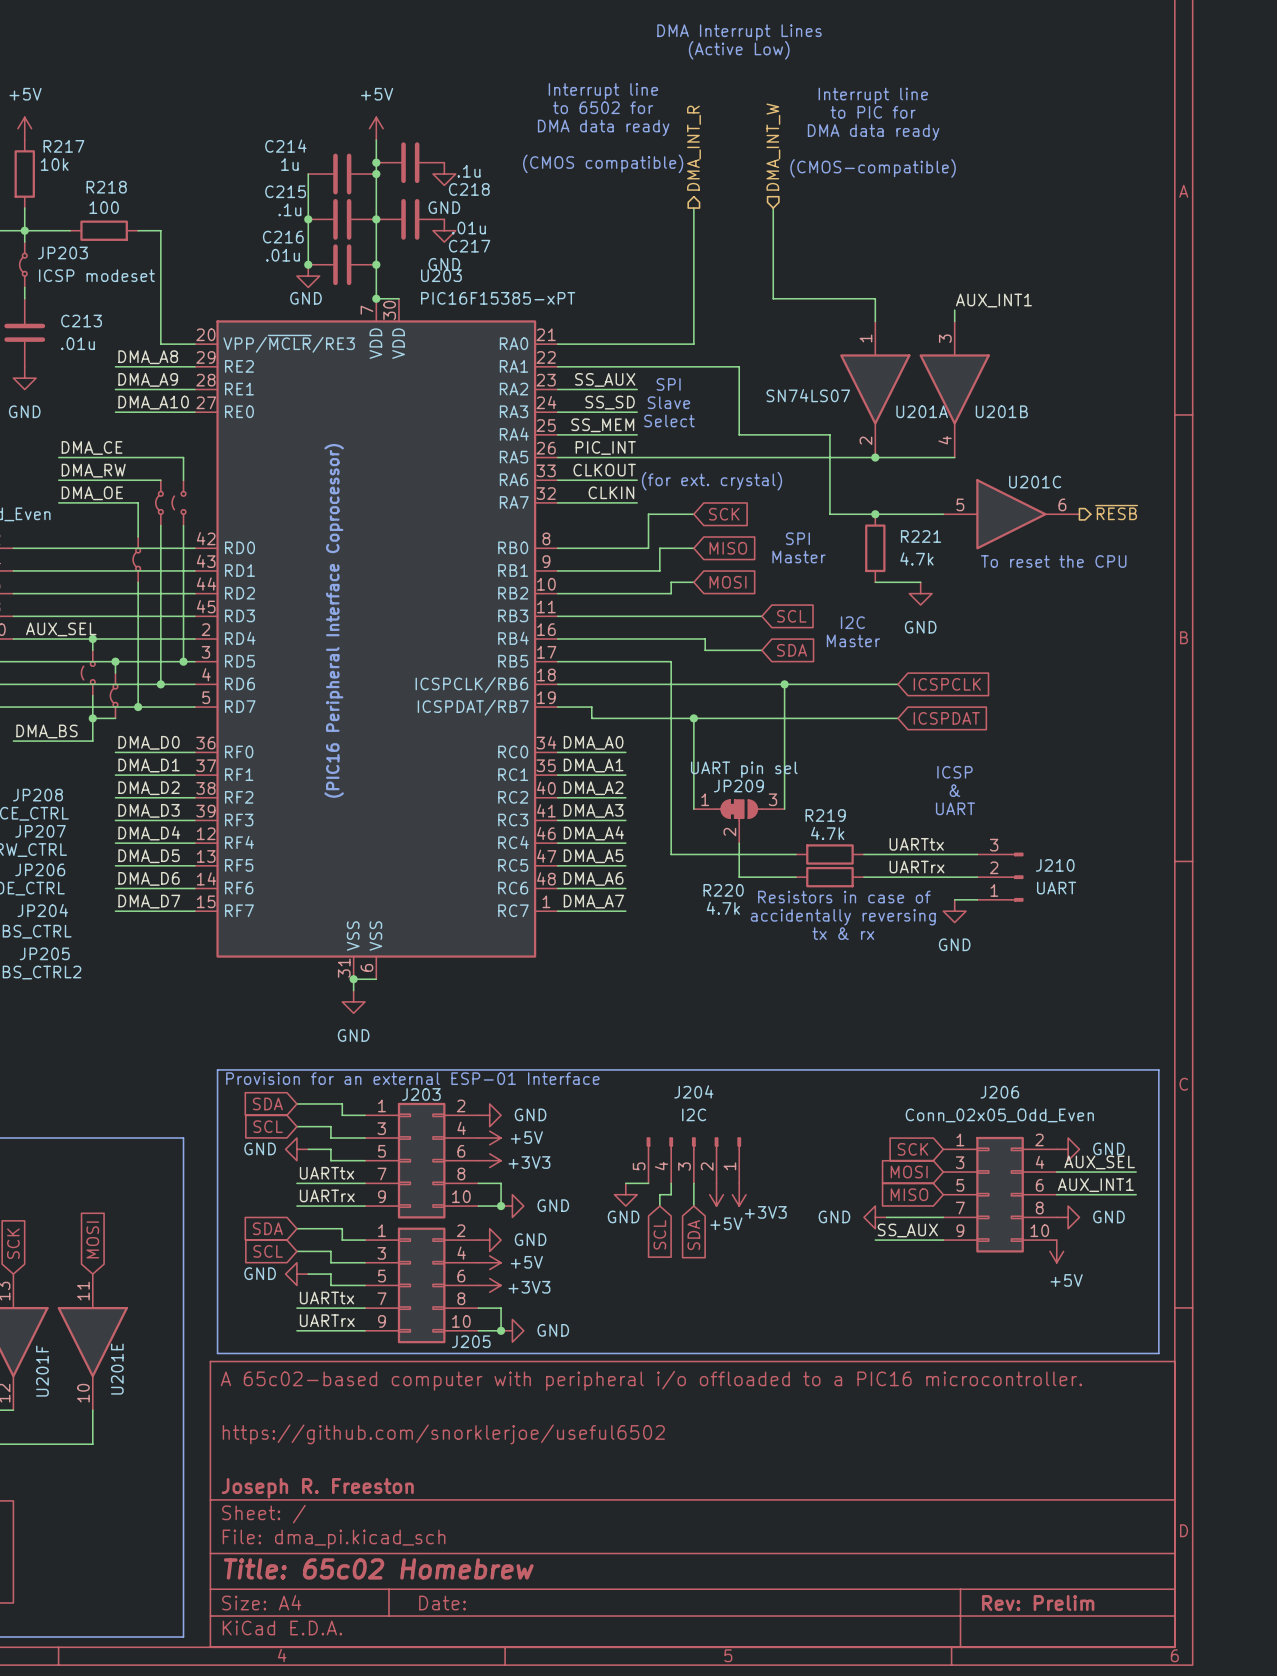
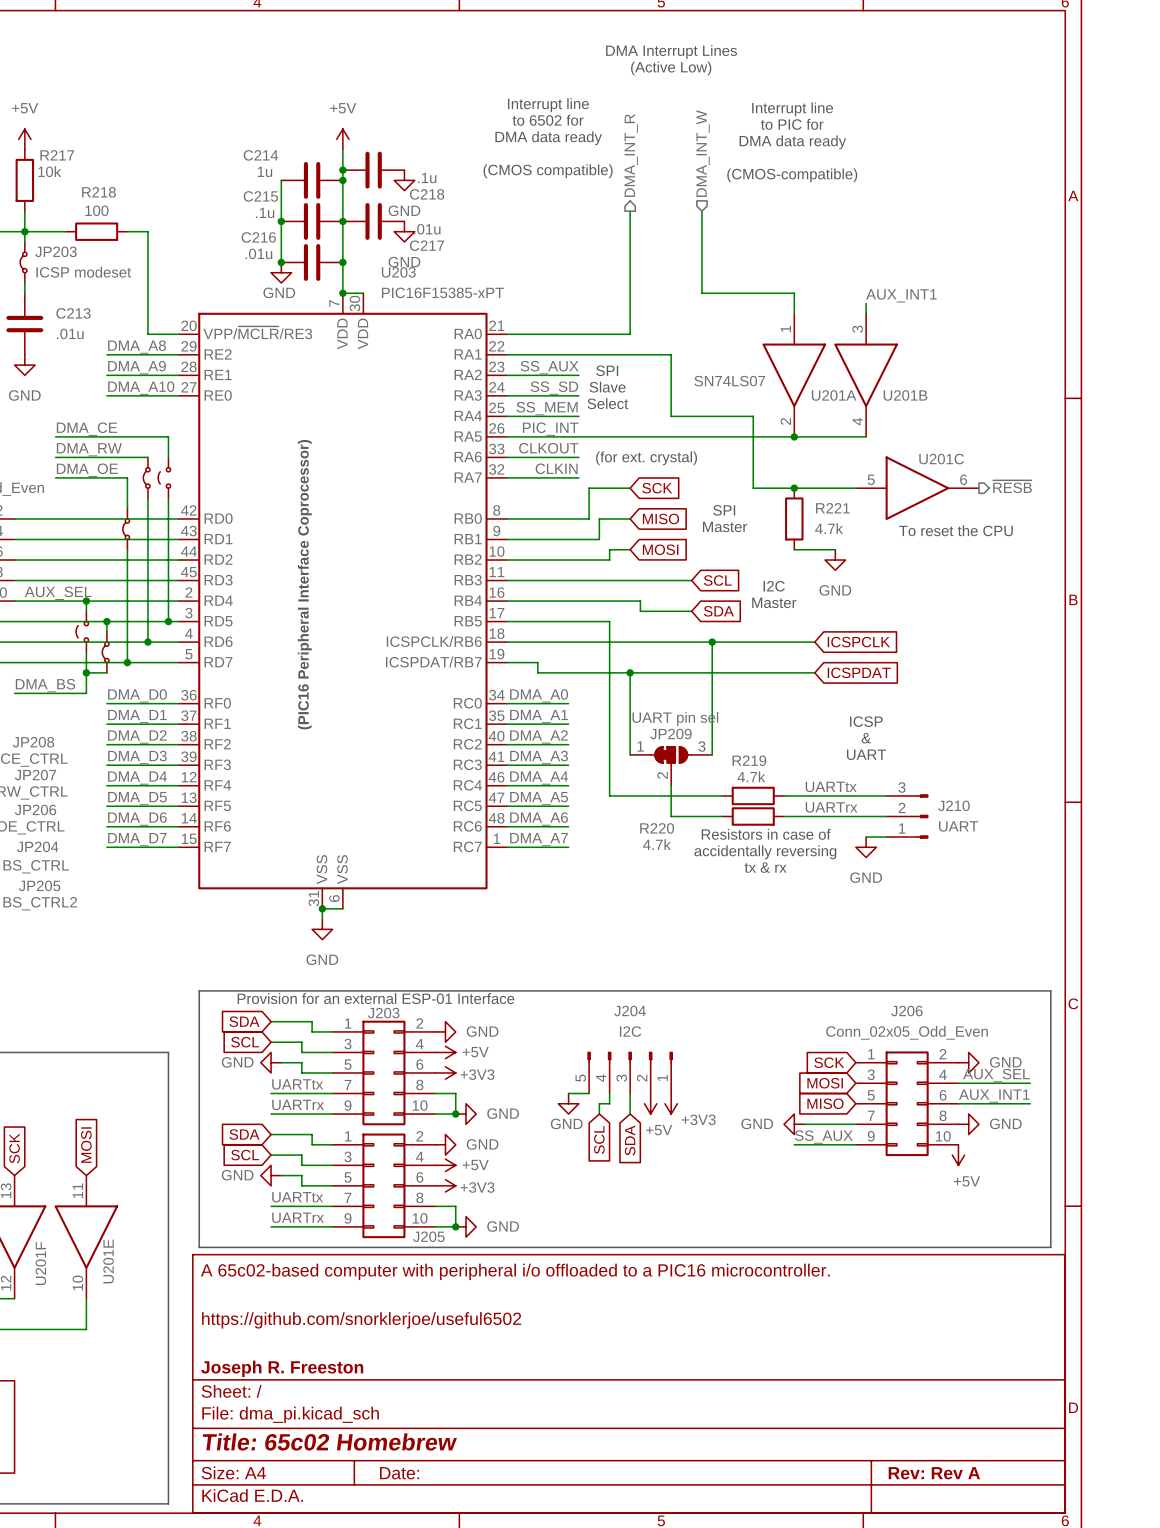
title block: Rev: Prelim (1038, 1603) -> Rev: Rev A (934, 1473)

